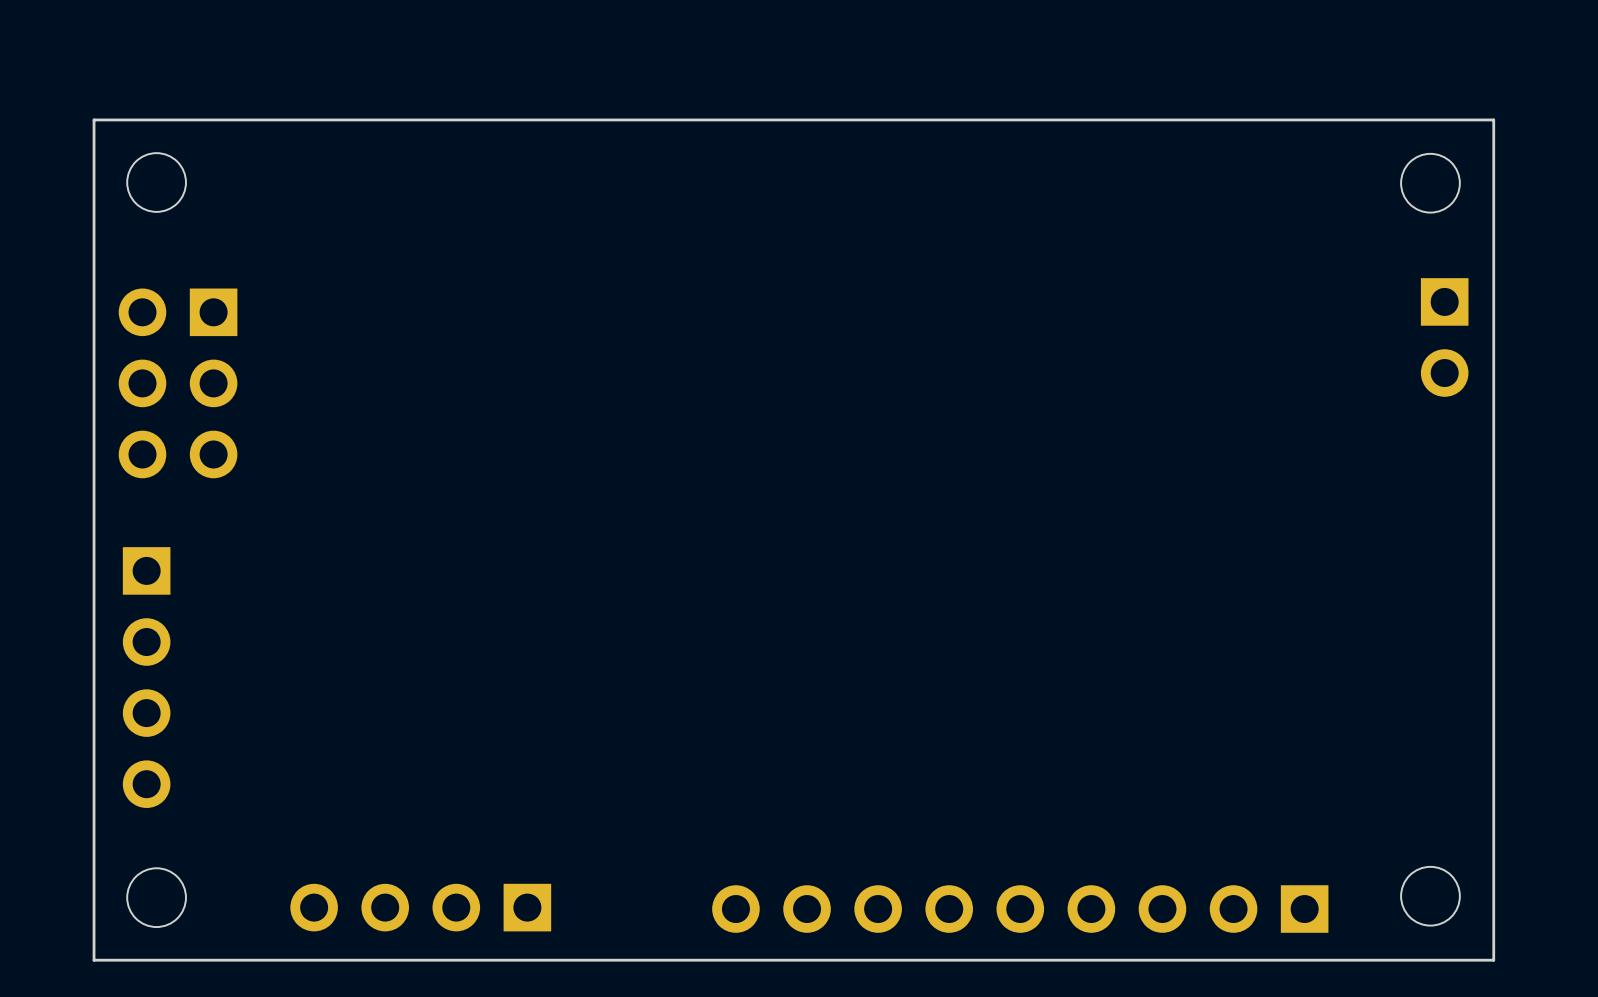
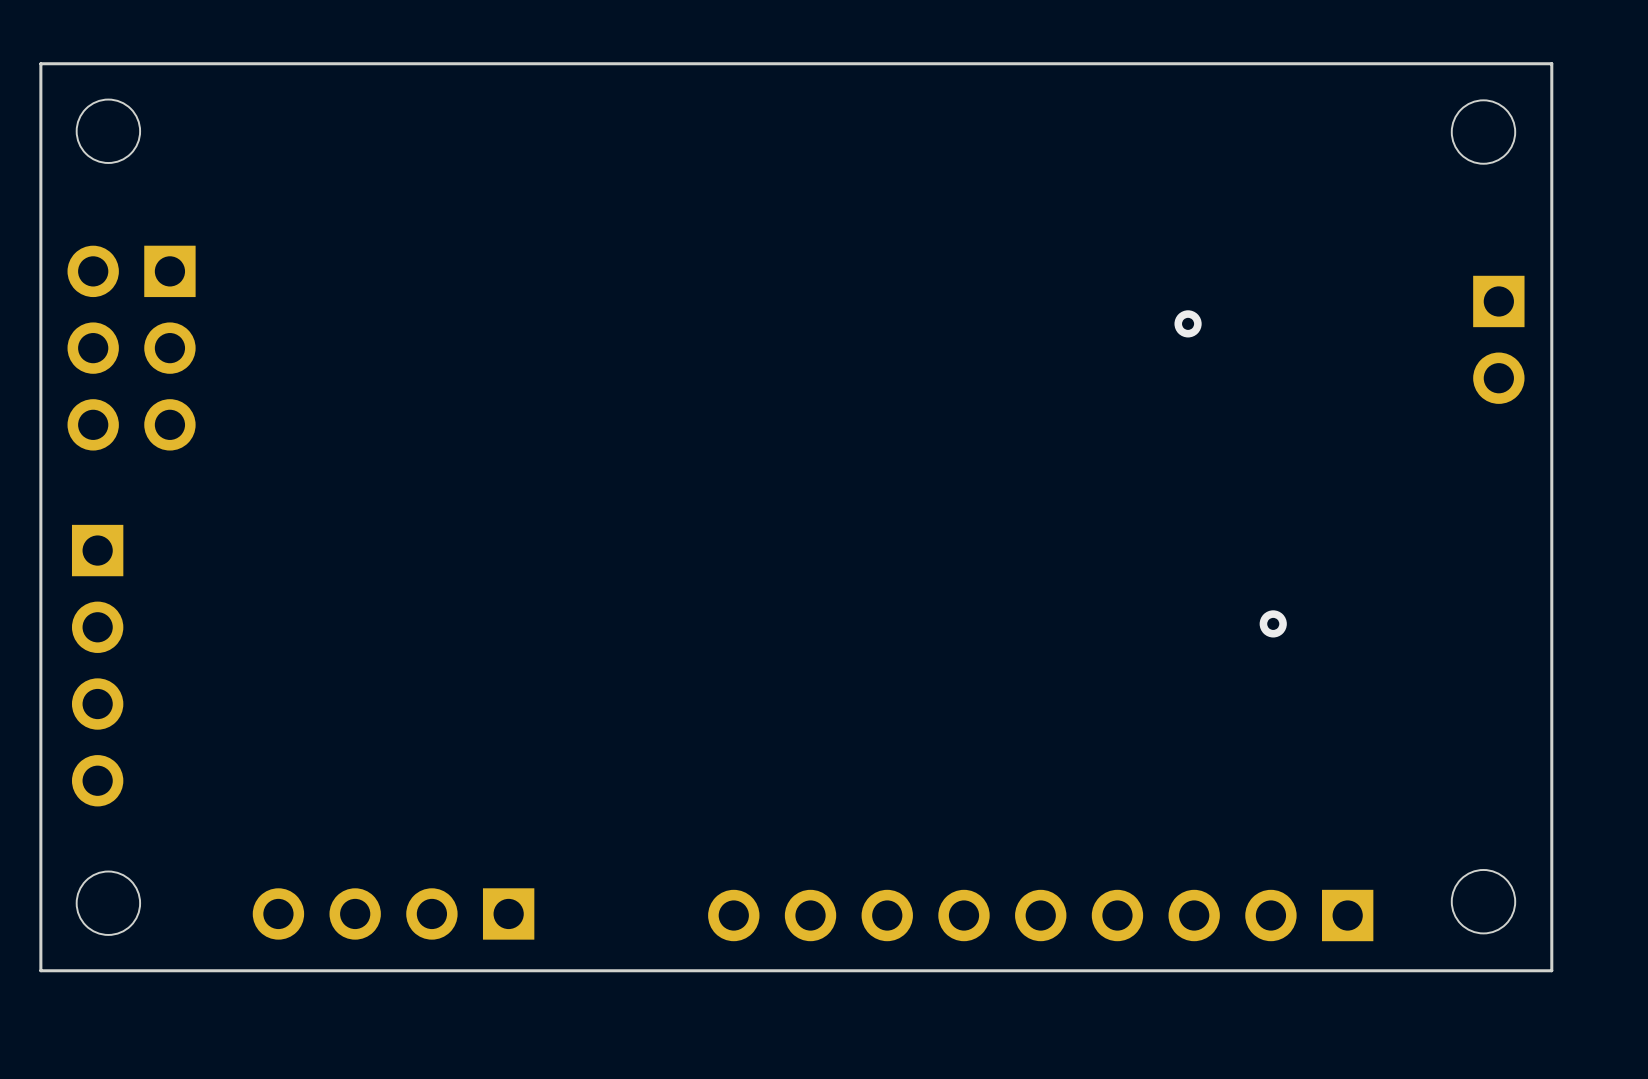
part position: (1444, 337) -> (1498, 339)
via: none -> (1188, 323)
via: none -> (1273, 623)

